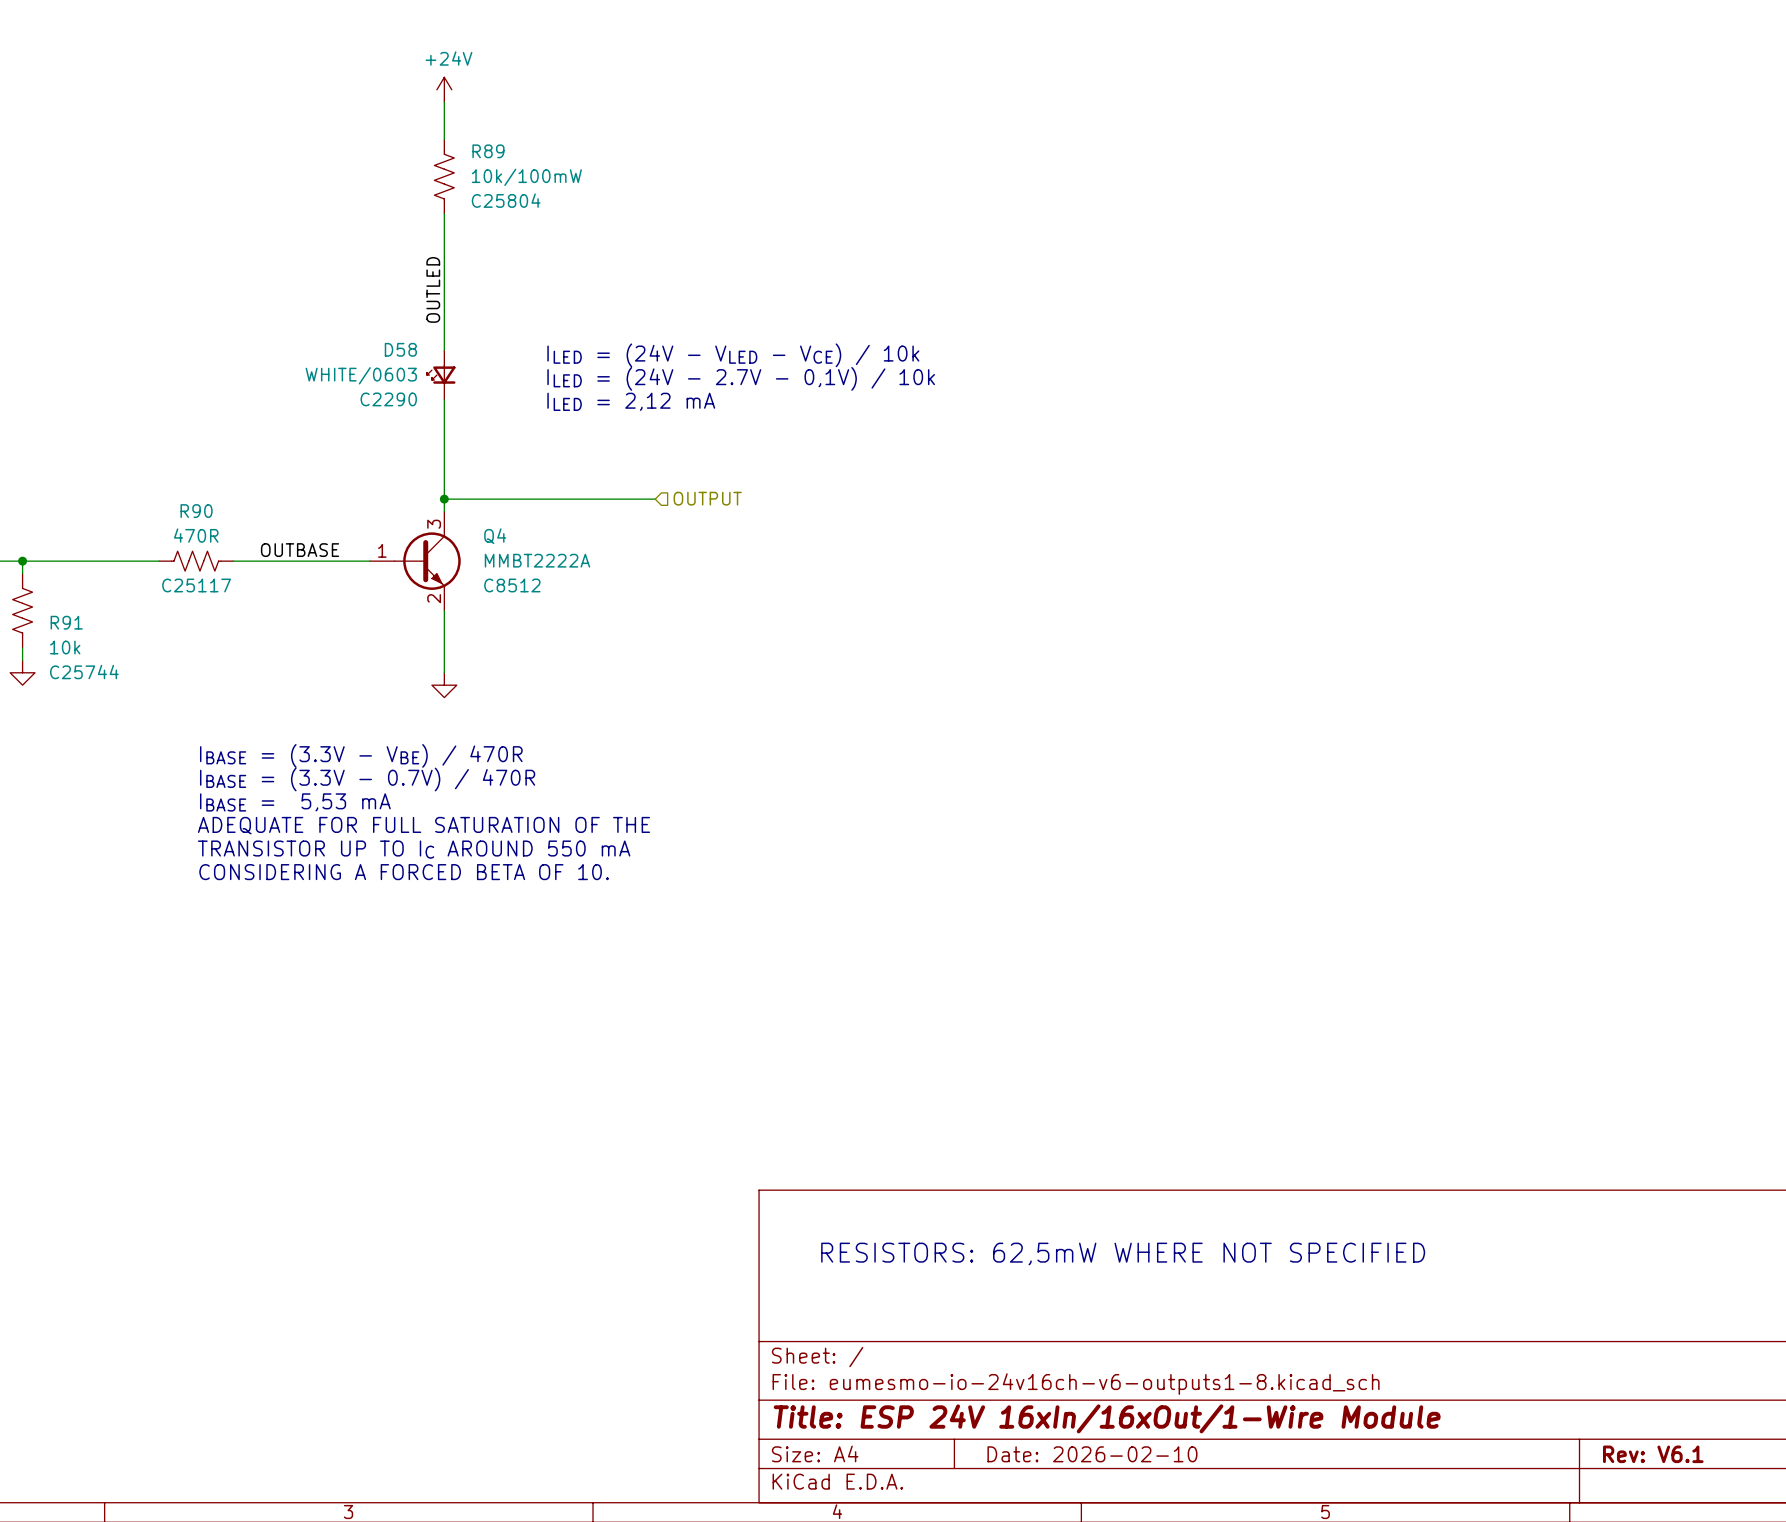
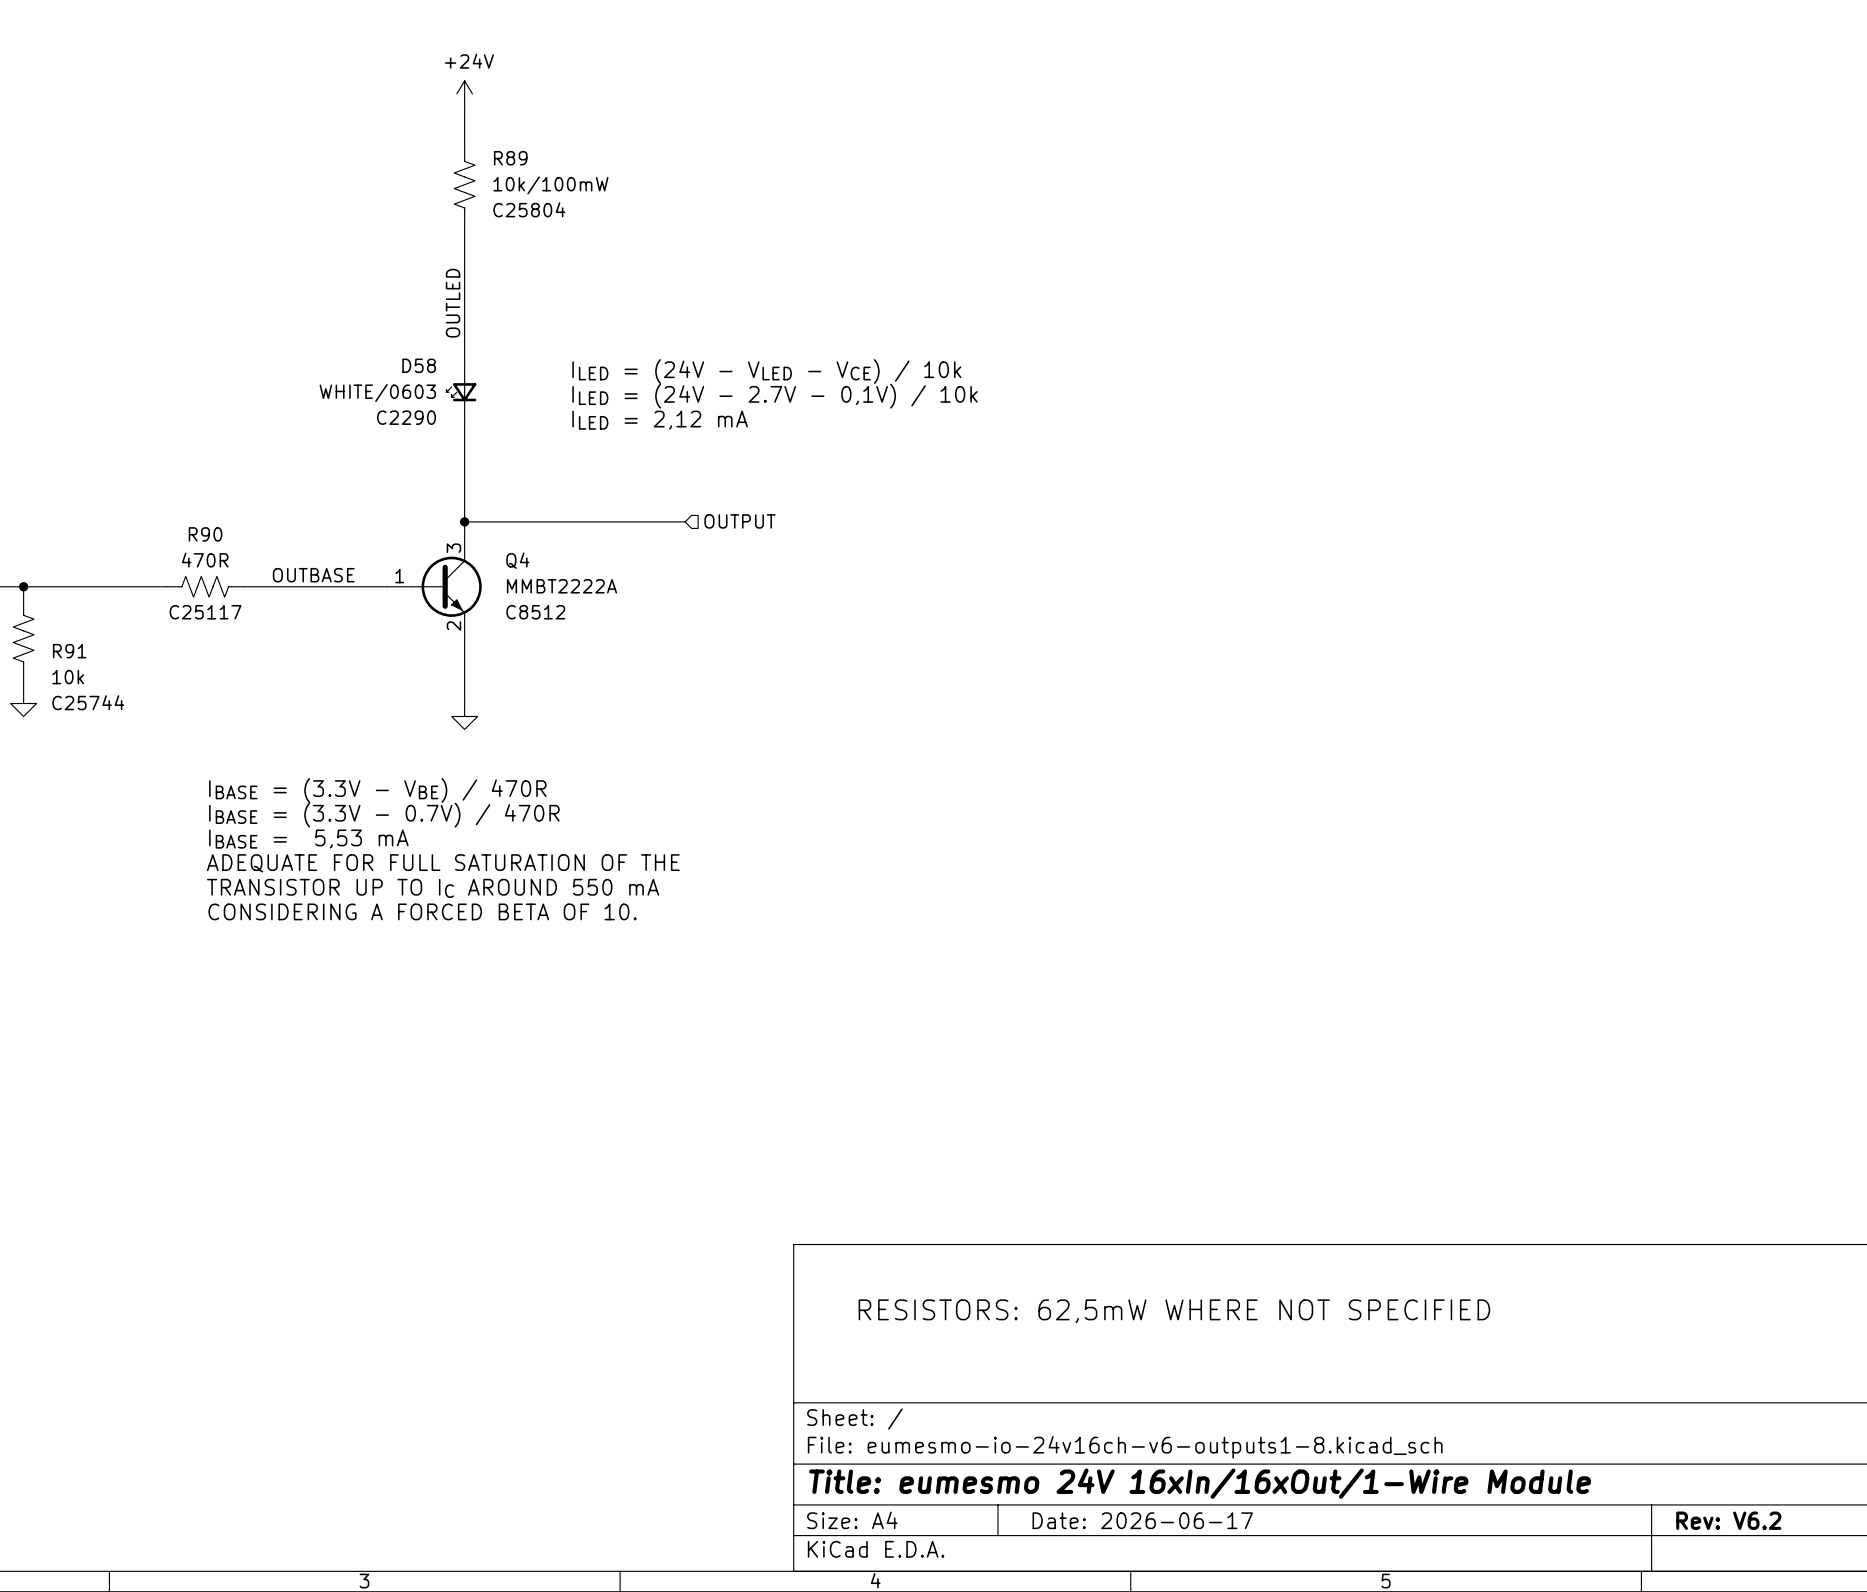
title block: Title: ESP 24V 16xIn/16xOut/1-Wire Module (1107, 1418) -> Title: eumesmo 24V 16xIn/16xOut/1-Wire Module (1200, 1483)
title block: Date: 2026-02-10 (1092, 1454) -> Date: 2026-06-17 (1142, 1520)
title block: Rev: V6.1 (1653, 1454) -> Rev: V6.2 (1728, 1520)

